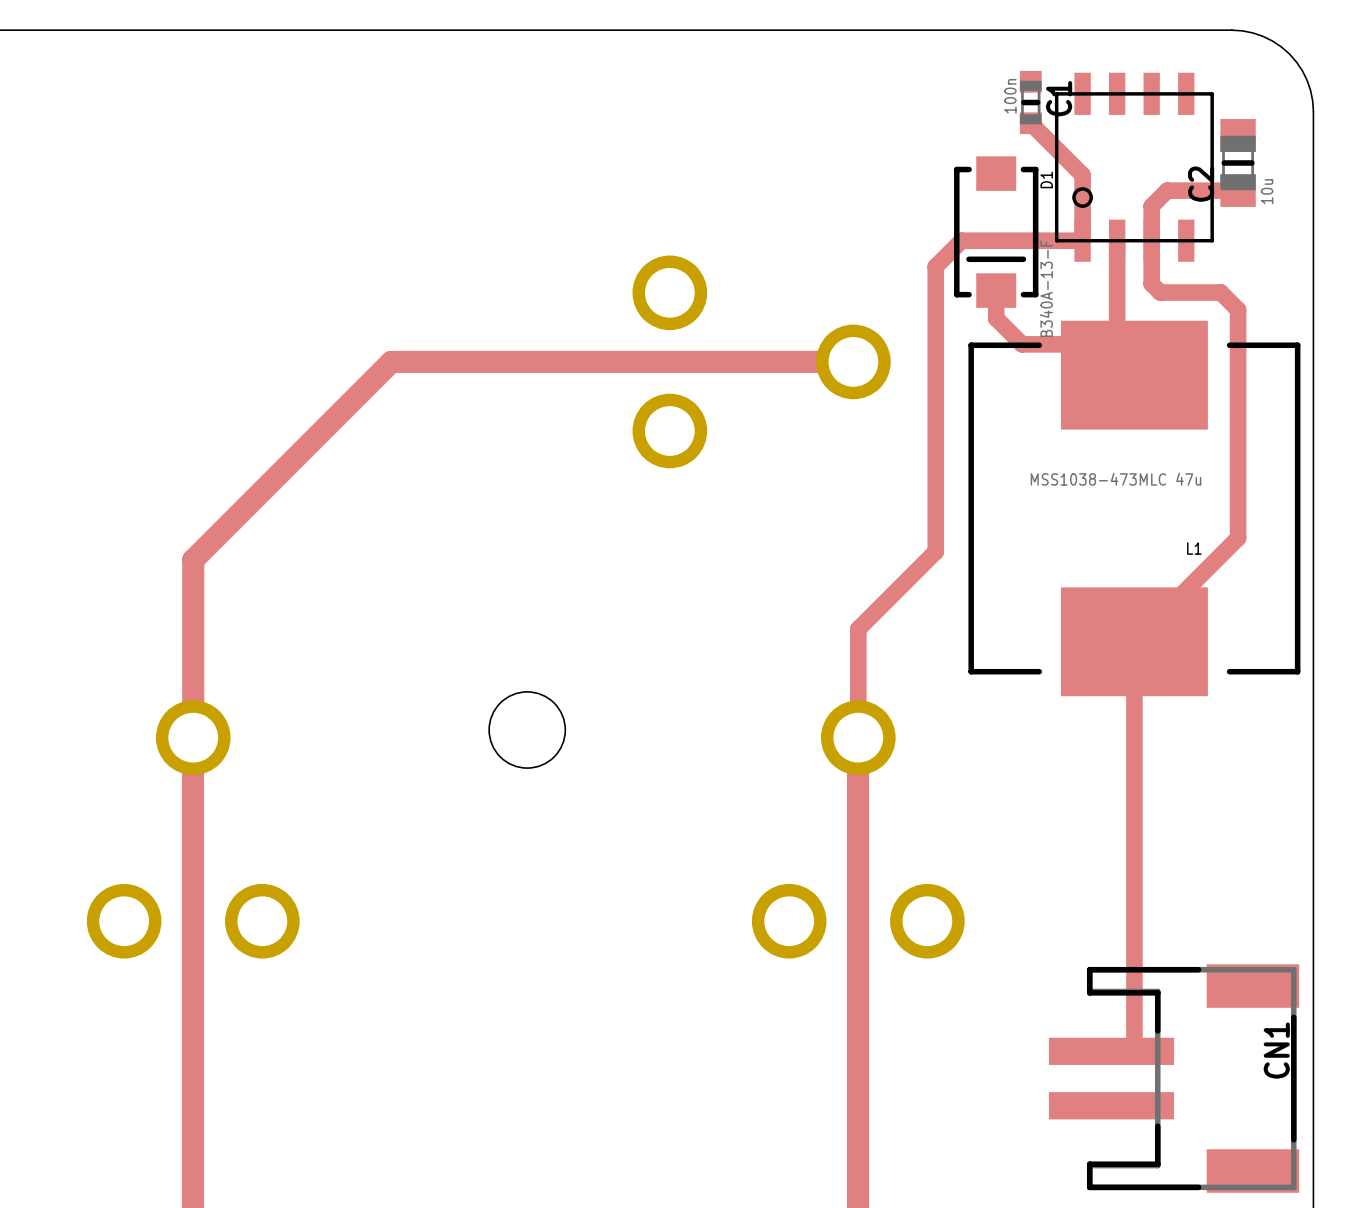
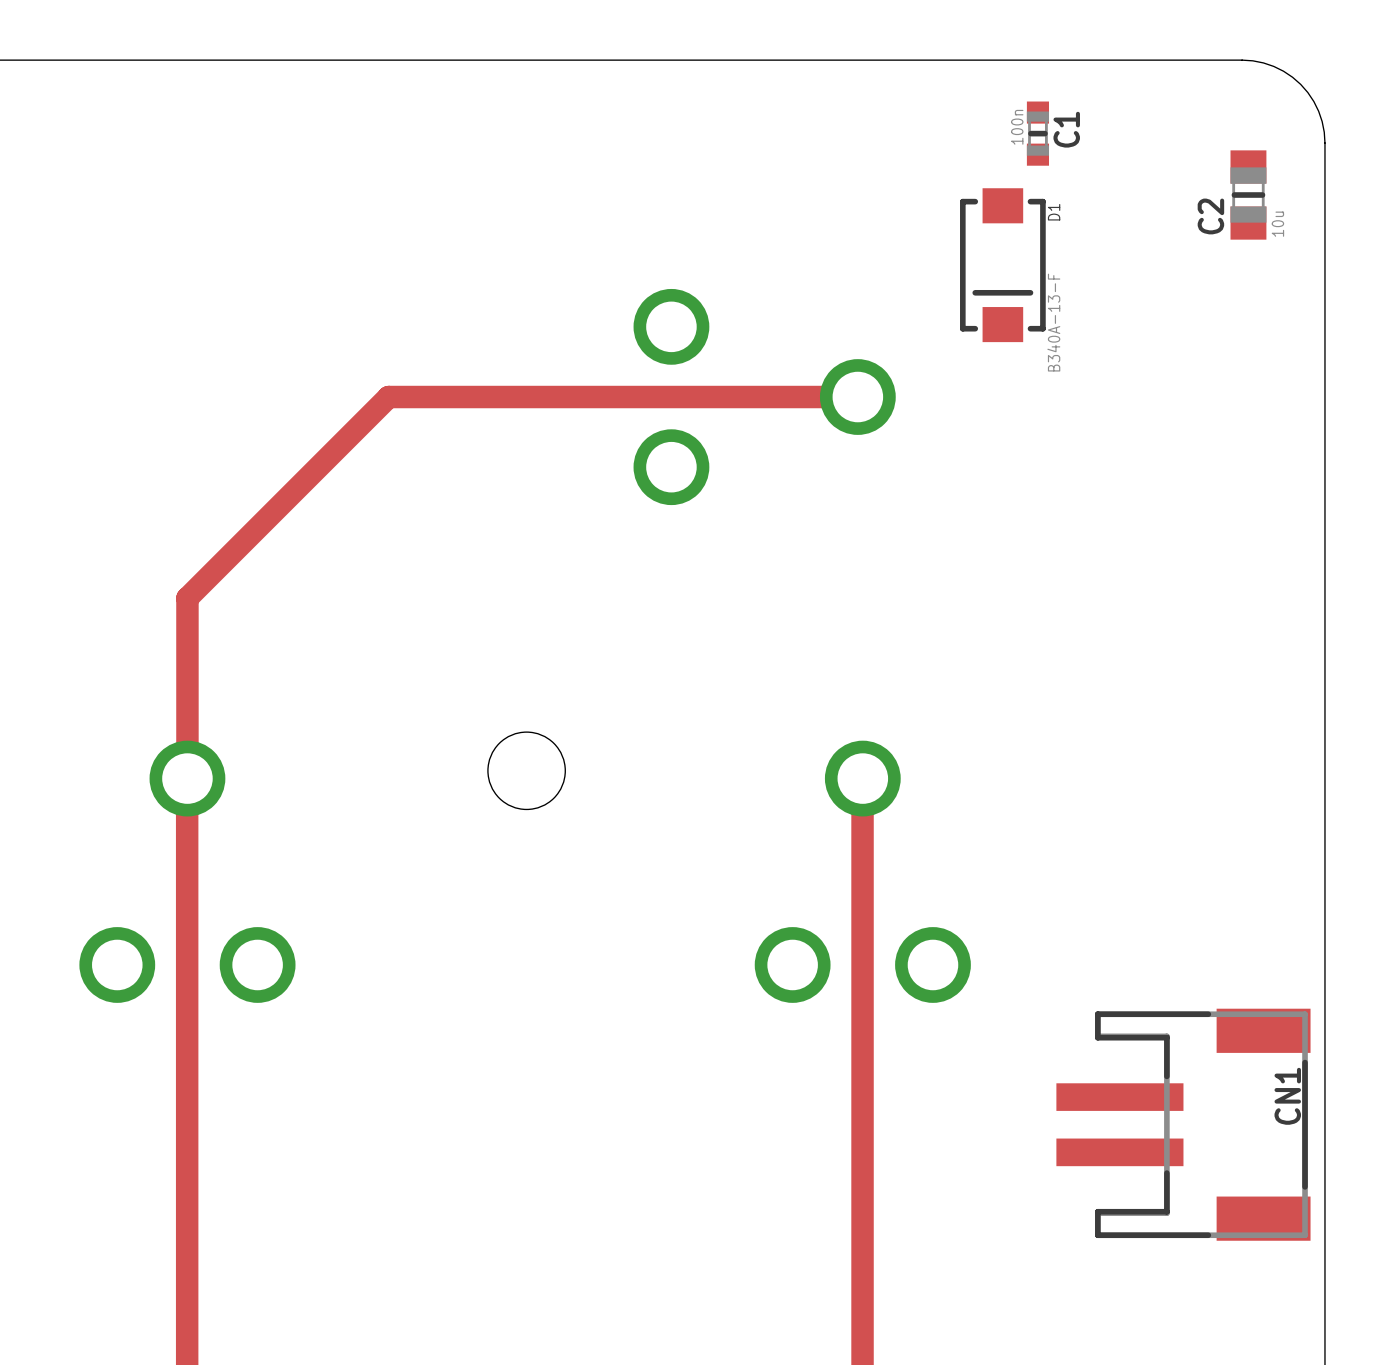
top track: (1030, 123) (1082, 175) (1082, 240) (961, 240) (935, 266) (935, 551) (858, 629) (858, 737) -> none
part: (1134, 167) -> none
top track: (1238, 190) (1167, 190) (1151, 206) (1151, 283) (1160, 292) (1220, 292) (1238, 309) (1238, 538) (1134, 641) (1134, 1052) (1111, 1051) -> none
top track: (1117, 240) (1117, 331) -> none
top track: (996, 290) (996, 318) (1022, 344) (1122, 344) (1117, 331) -> none
L1: MSS1038-473MLC 47u (1134, 508) -> none

